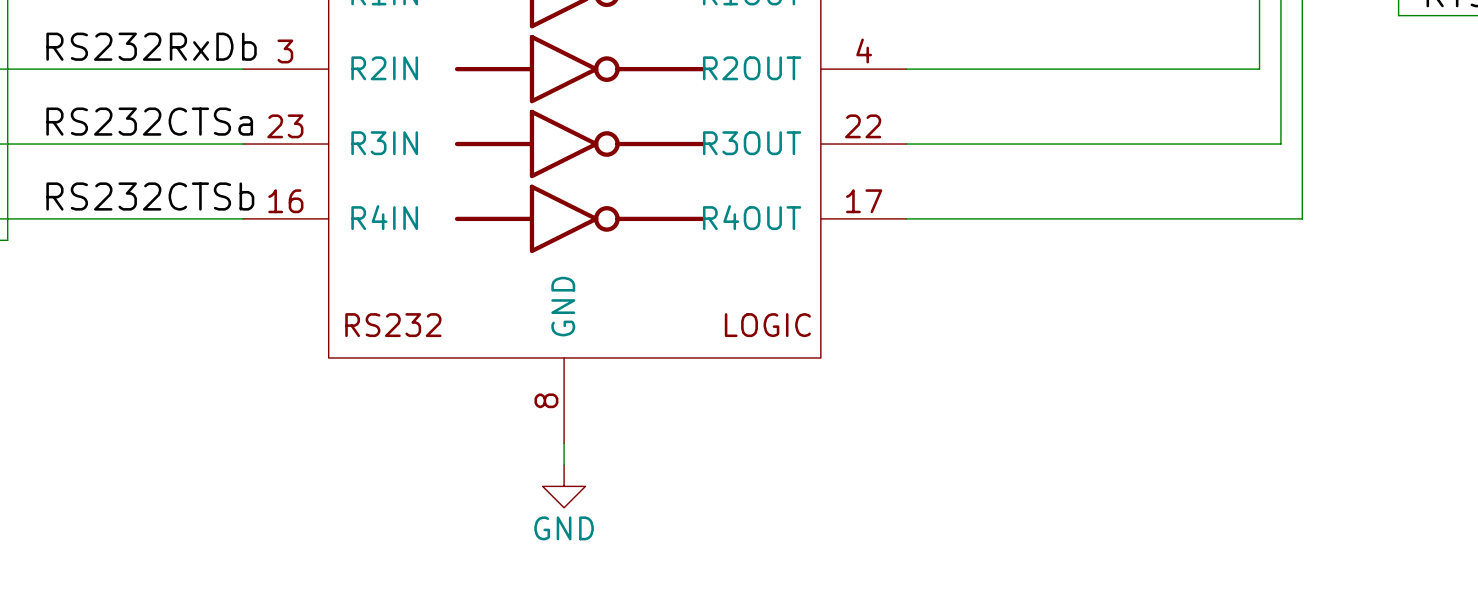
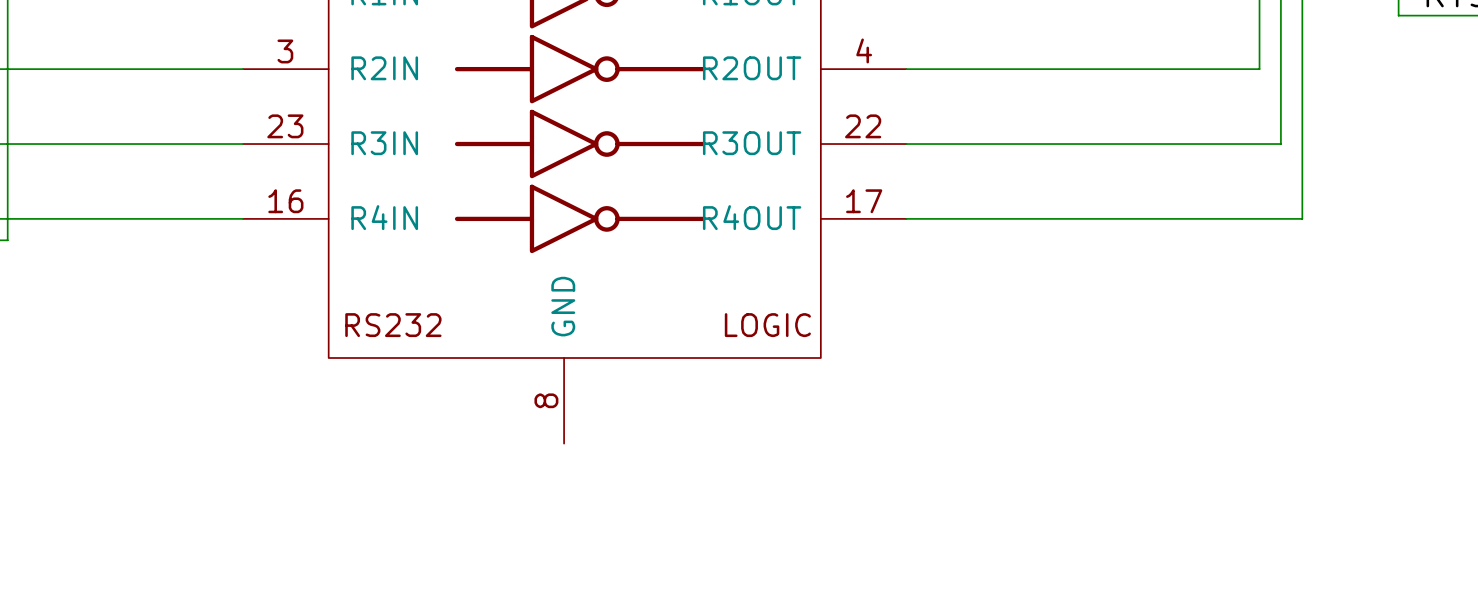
label: RS232RxDb (151, 46) -> none
label: RS232CTSa (149, 121) -> none
label: RS232CTSb (150, 196) -> none
wire: (564, 443) (564, 464) -> none
power symbol: GND (564, 486) -> none

